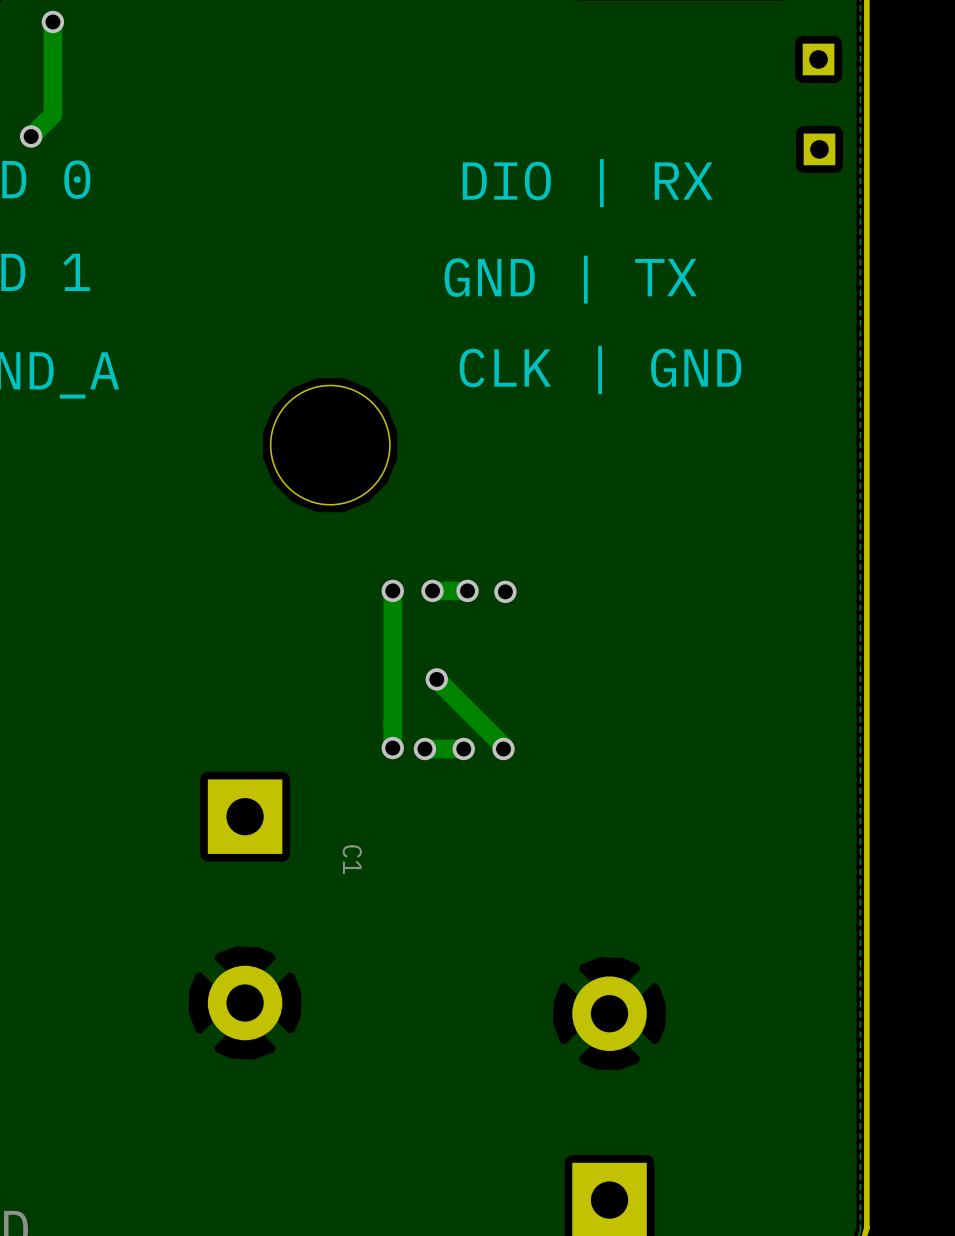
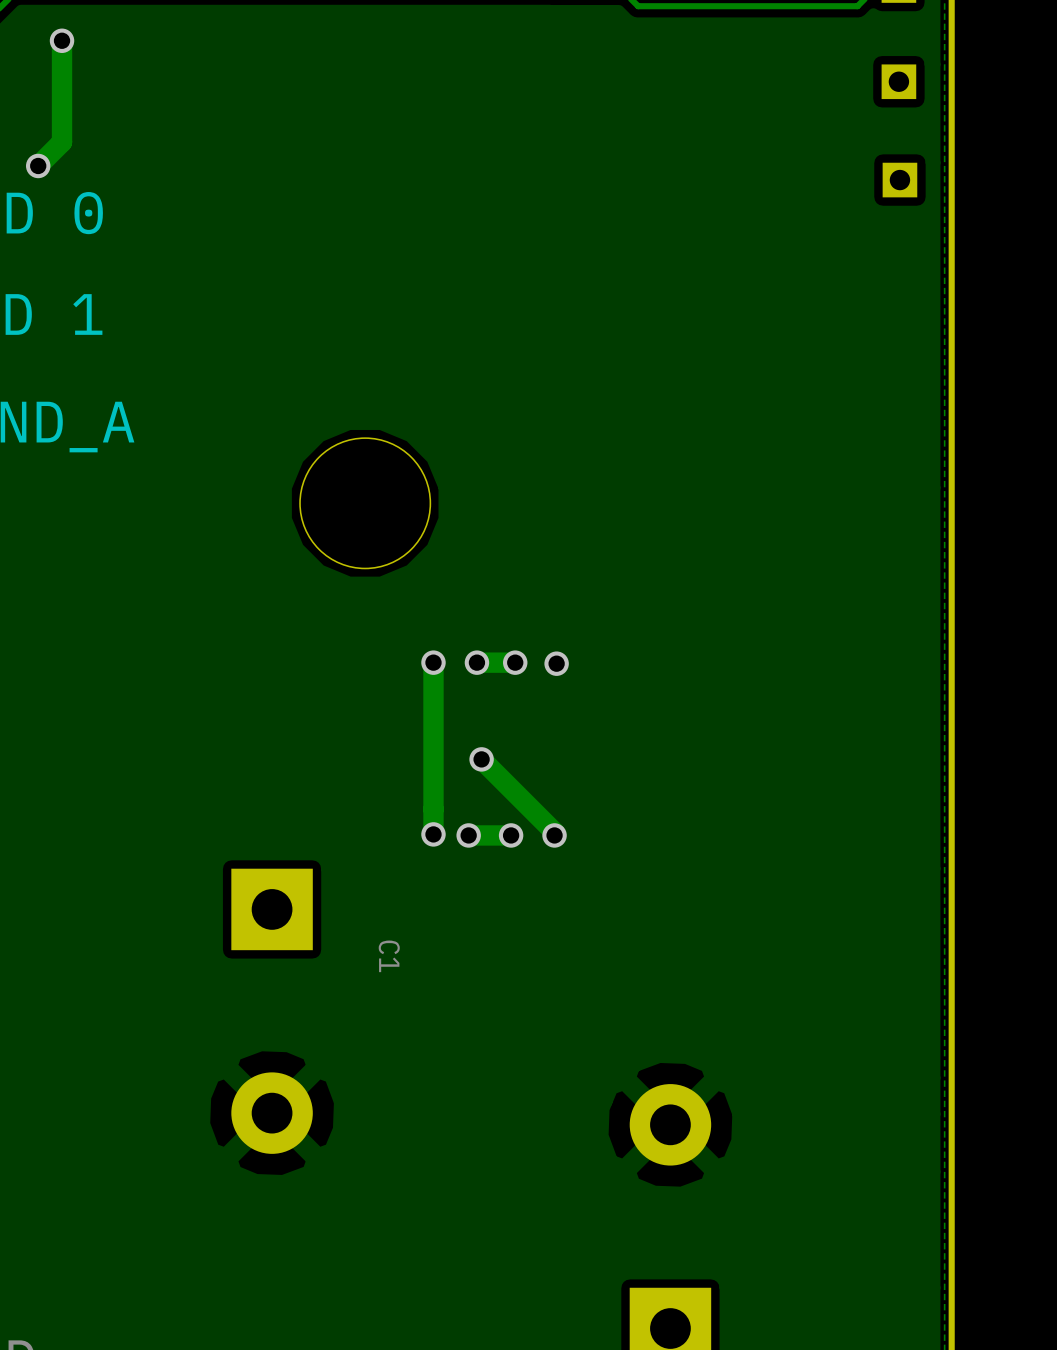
text: DIO | RX (587, 183) -> none
text: GND | TX (570, 279) -> none
text: CLK | GND (600, 370) -> none

